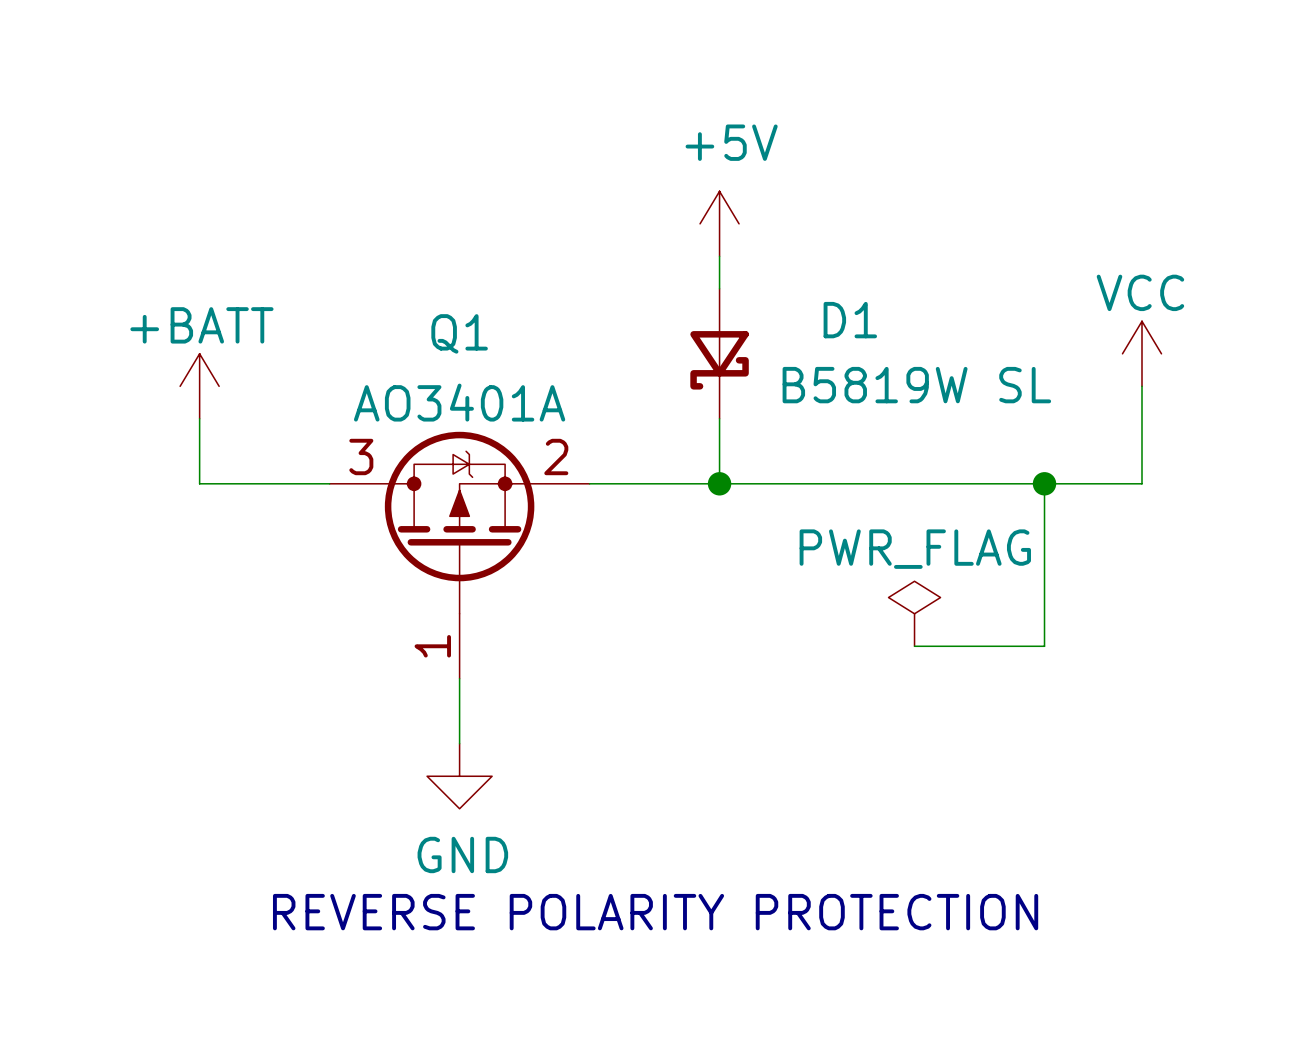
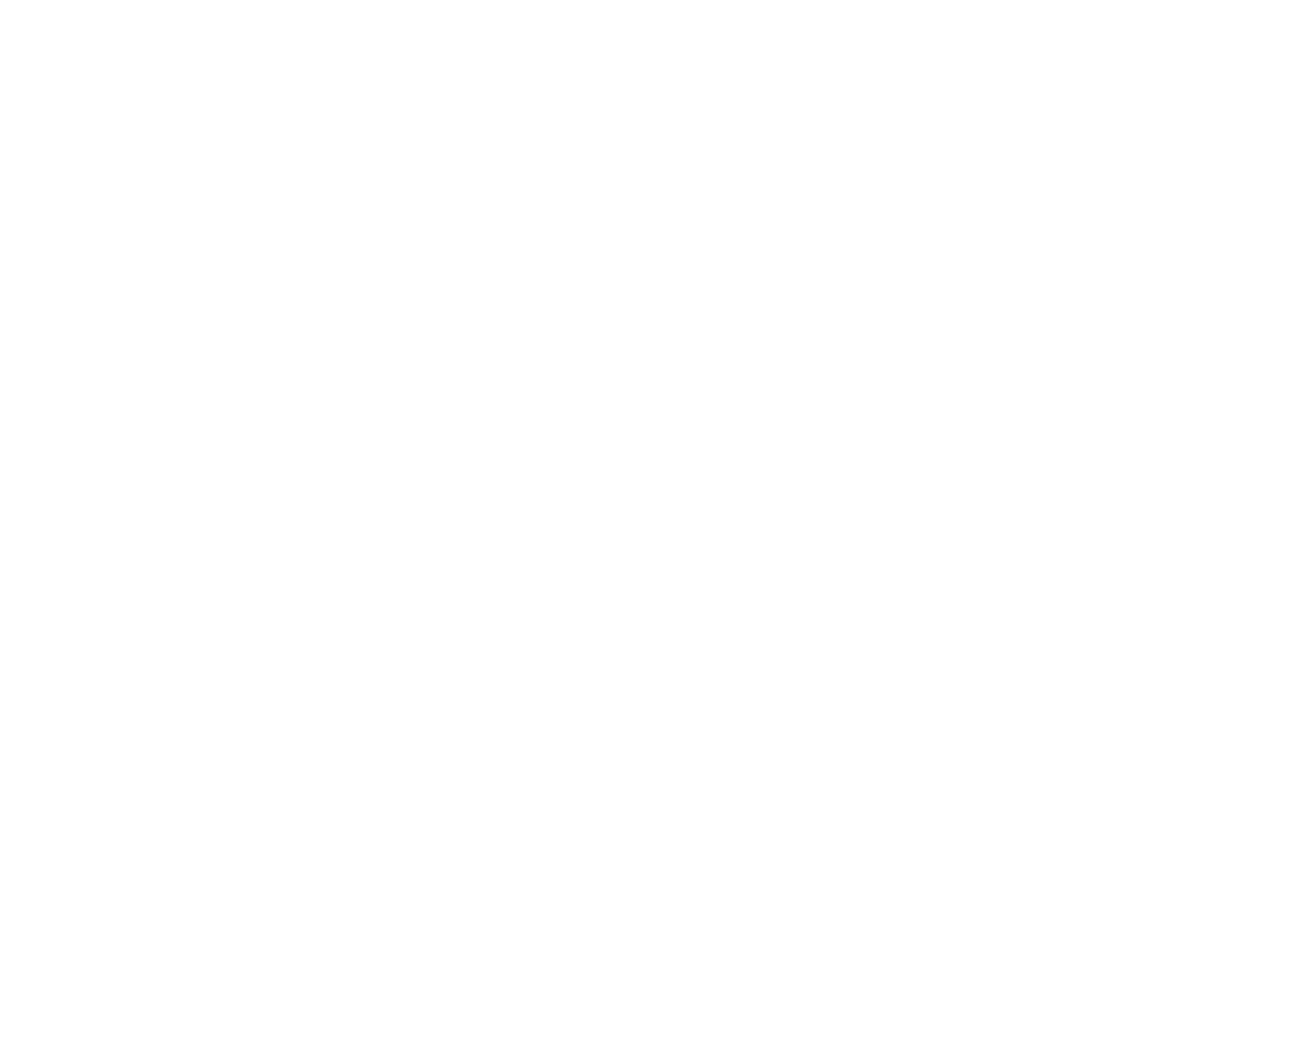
power symbol: +5V (719, 223) -> none
wire: (719, 256) (719, 288) -> none
D1: B5819W SL (719, 353) -> none
power symbol: VCC (1141, 353) -> none
power symbol: +BATT (199, 386) -> none
wire: (1141, 386) (1141, 483) (589, 483) -> none
wire: (199, 418) (199, 483) (329, 483) -> none
wire: (719, 418) (719, 483) -> none
junction: (719, 483) -> none
wire: (1044, 483) (1044, 646) (914, 646) -> none
junction: (1044, 483) -> none
Q1: AO3401A (459, 555) -> none
power symbol: PWR_FLAG (914, 613) -> none
wire: (459, 678) (459, 743) -> none
power symbol: GND (459, 776) -> none
text: REVERSE POLARITY PROTECTION (655, 912) -> none

